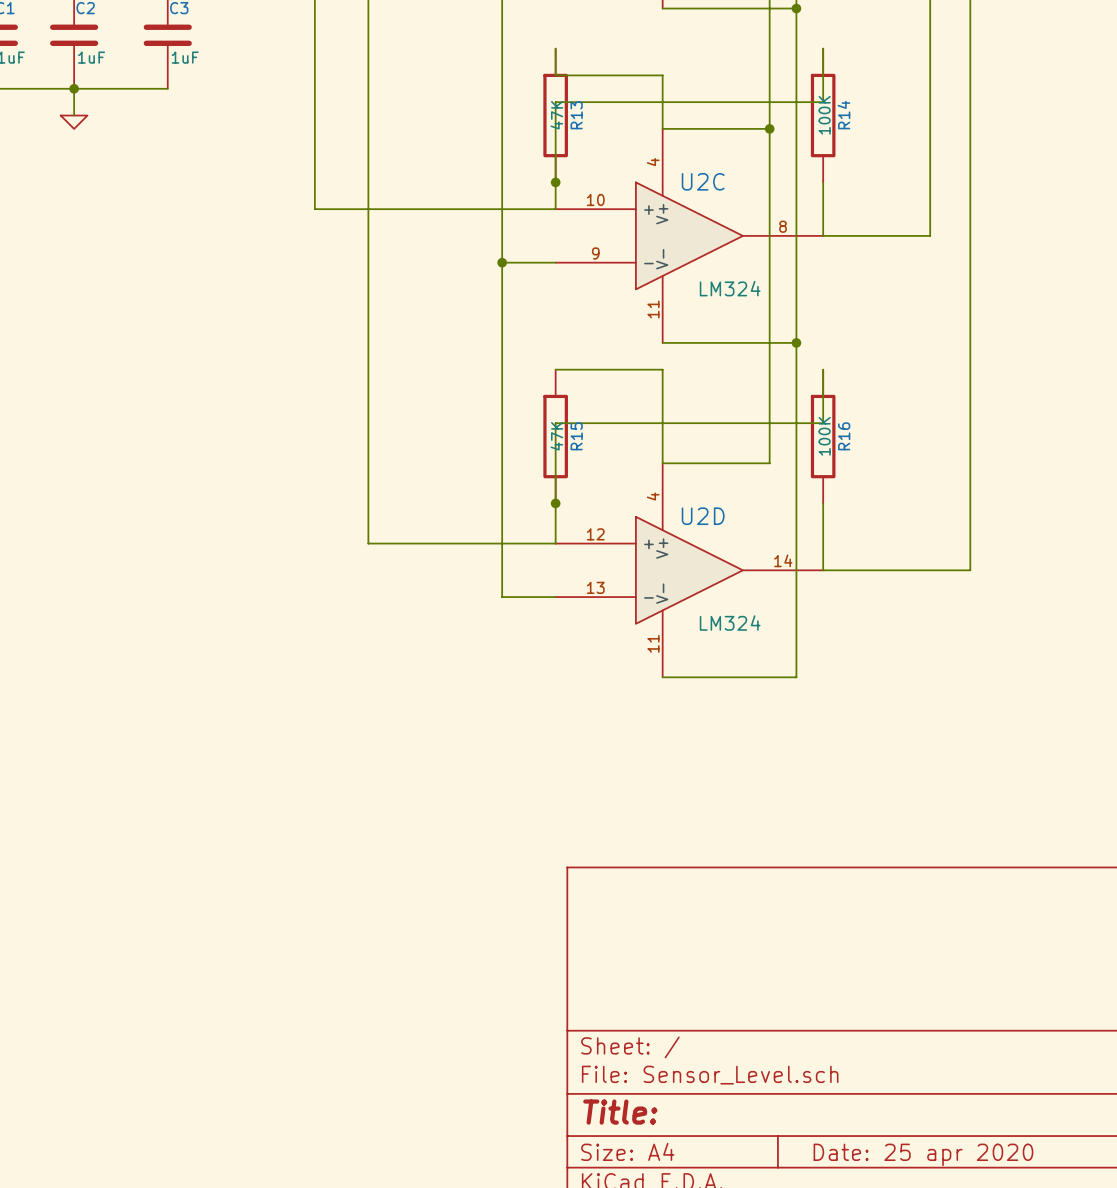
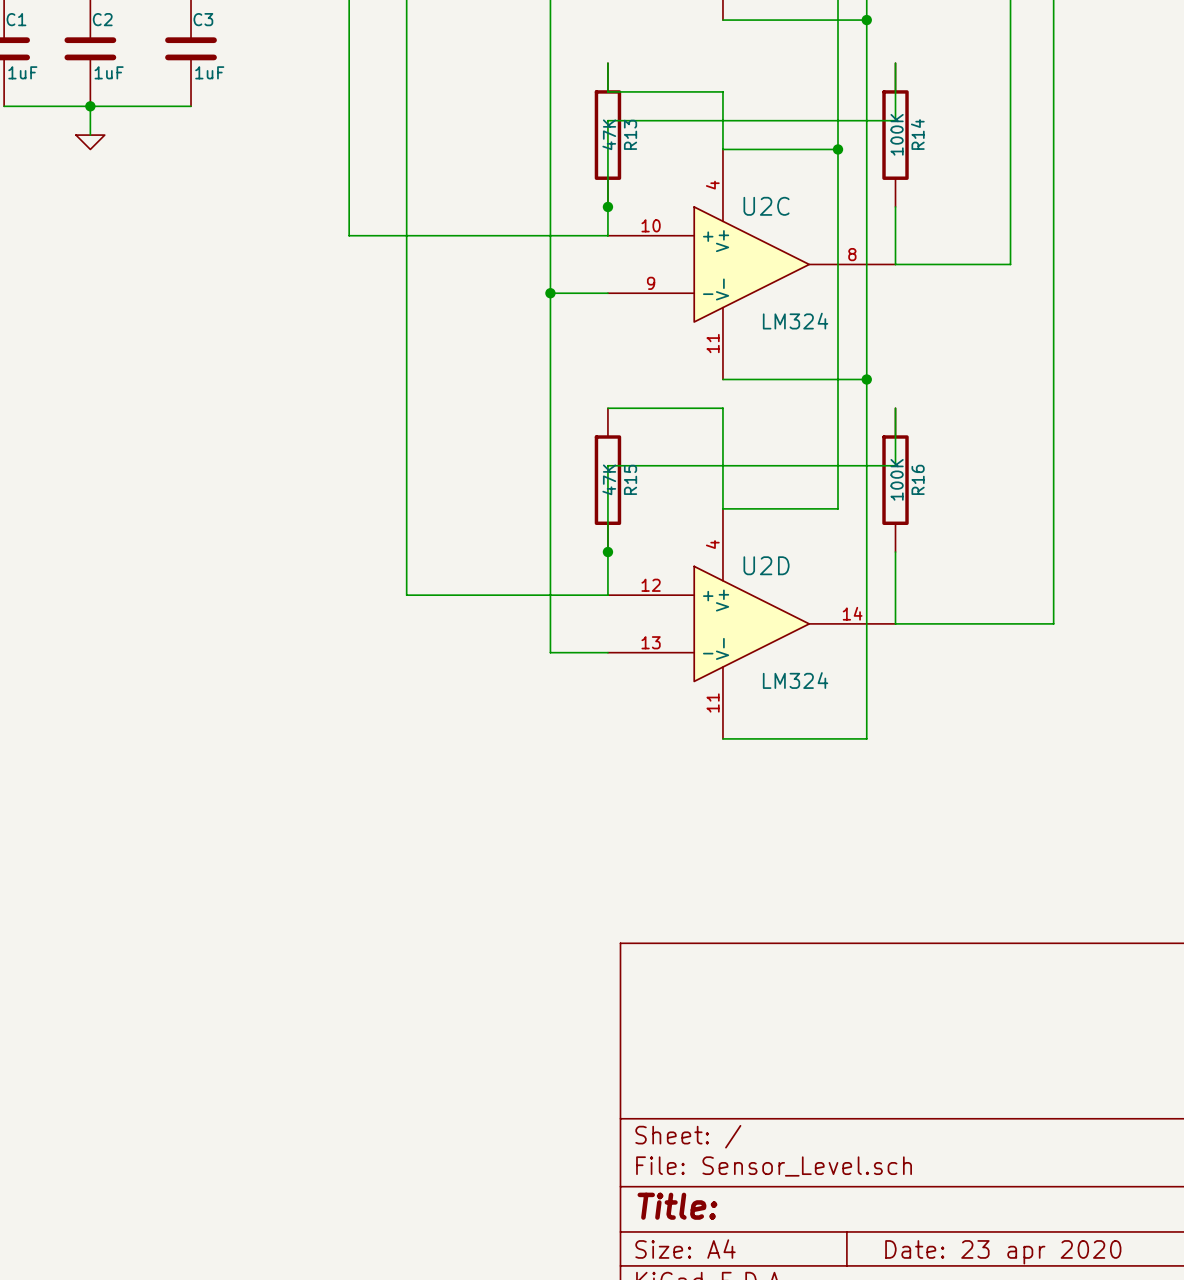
title block: Date: 25 apr 2020 (923, 1154) -> Date: 23 apr 2020 (1003, 1252)

